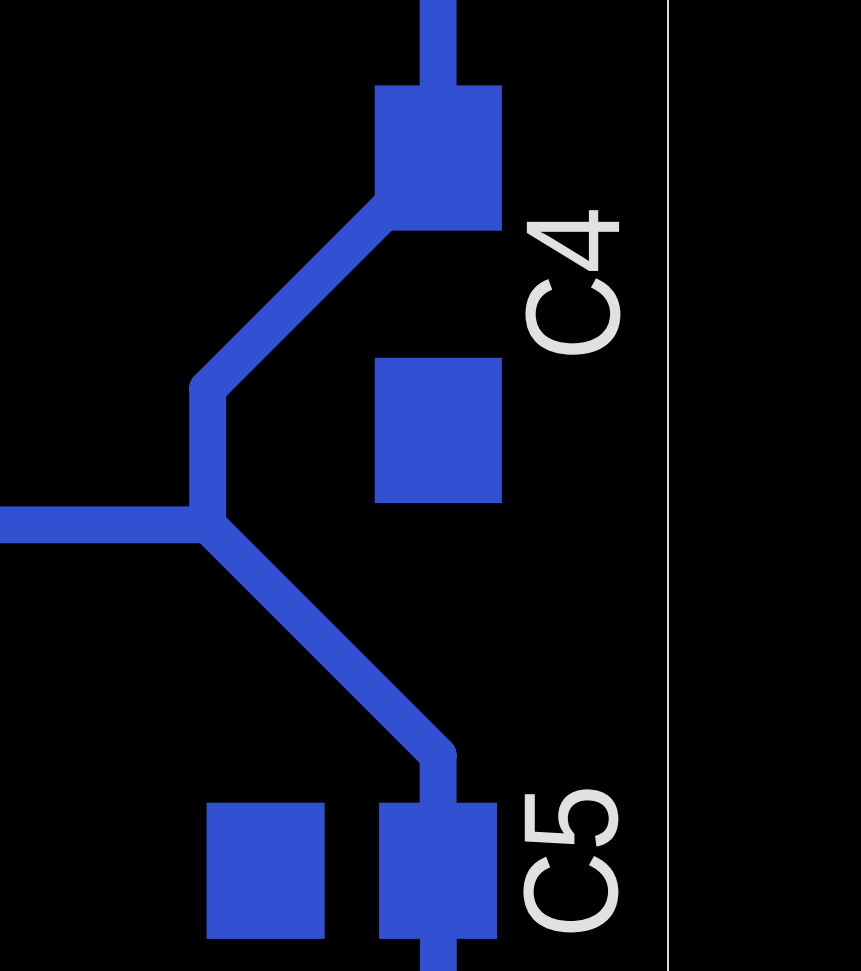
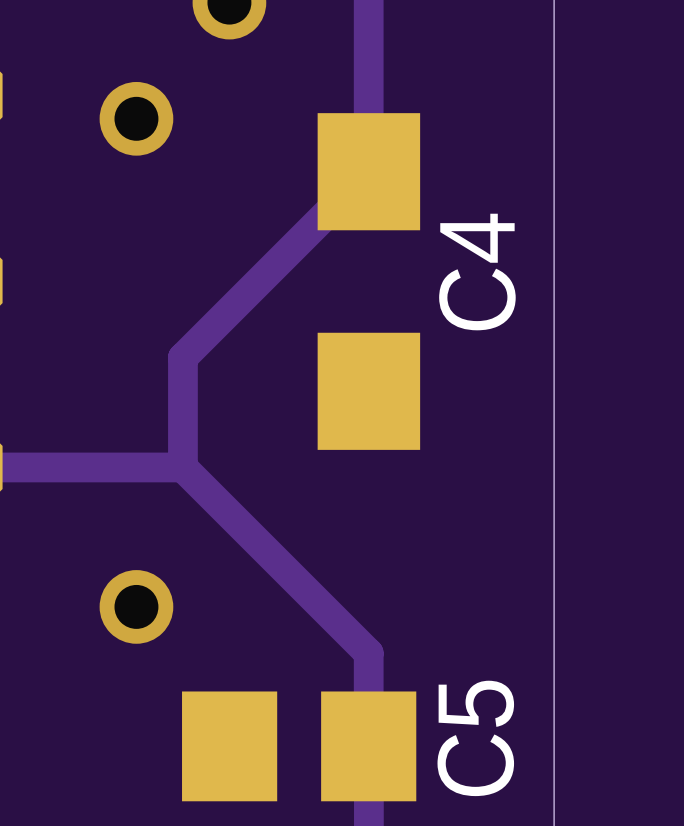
via: none -> (136, 118)
via: none -> (136, 606)

